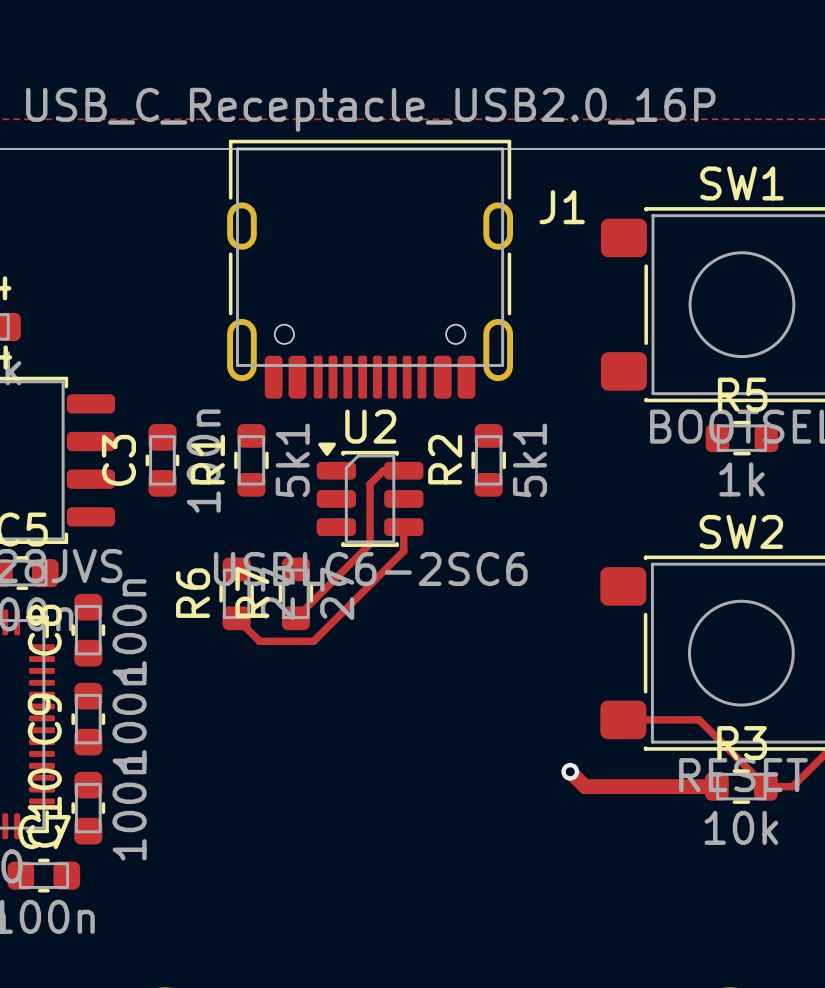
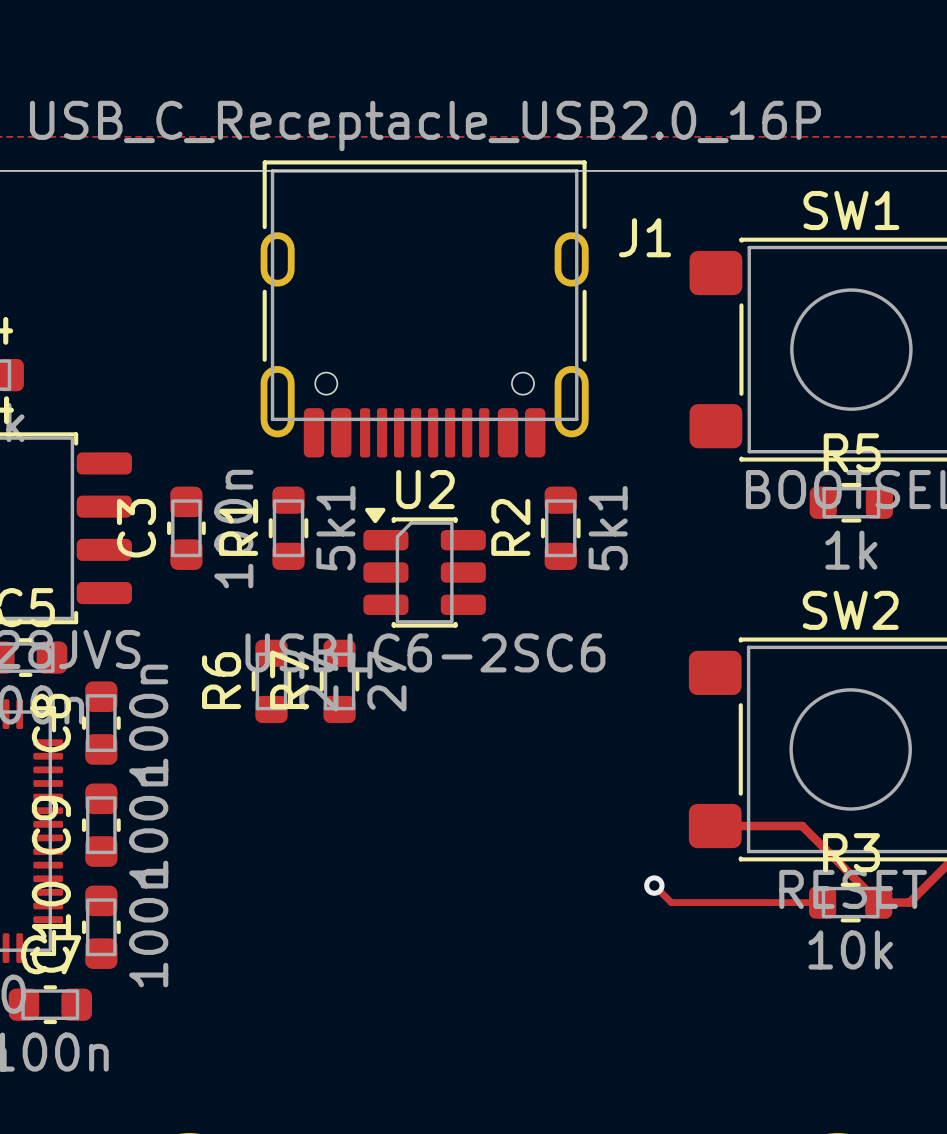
track: (403, 470) (383, 470) (370, 484) (370, 544) (295, 618) -> none
track: (403, 527) (403, 551) (313, 641) (259, 641) (236, 618) -> none
track width: thick (570, 771) (585, 786) (716, 786) -> thin (654, 885) (671, 902) (822, 902)

